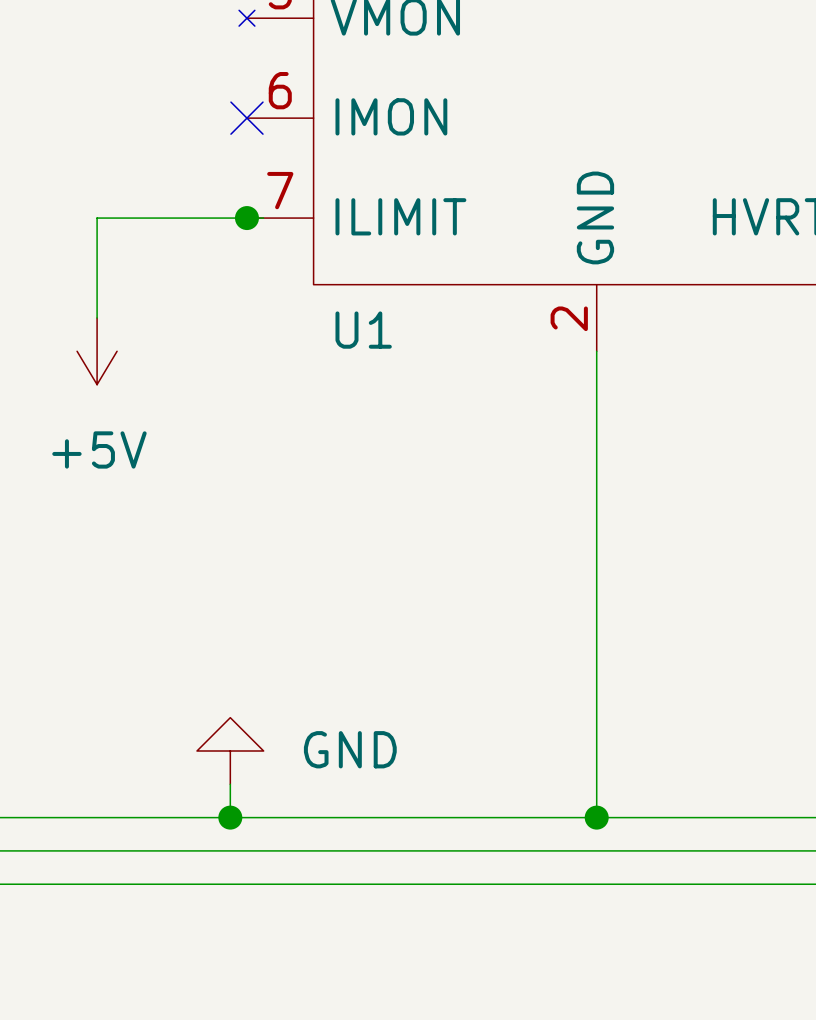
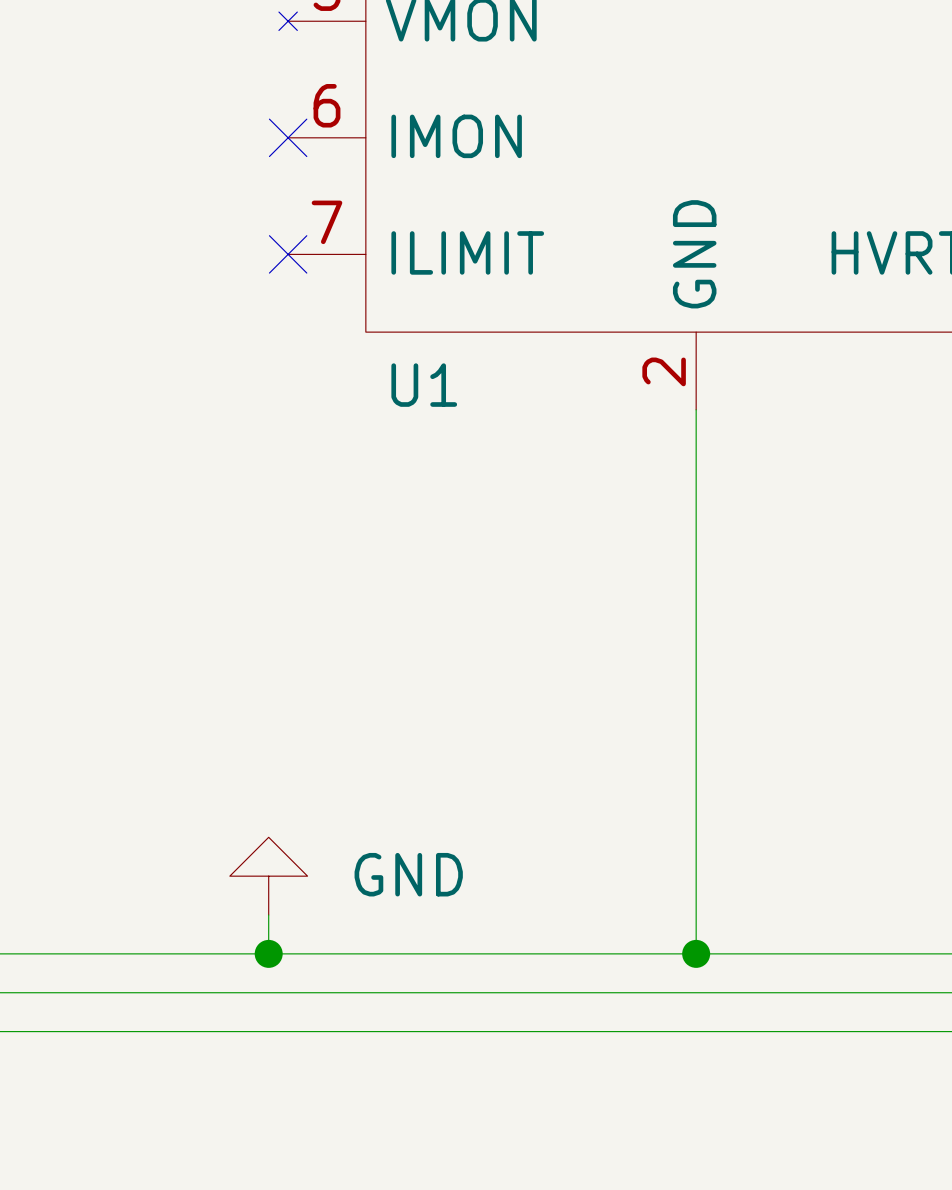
junction: (246, 218) -> none
no-connect mark: none -> (288, 254)
wire: (263, 218) (97, 218) (97, 317) -> none
power symbol: +5V (97, 351) -> none

